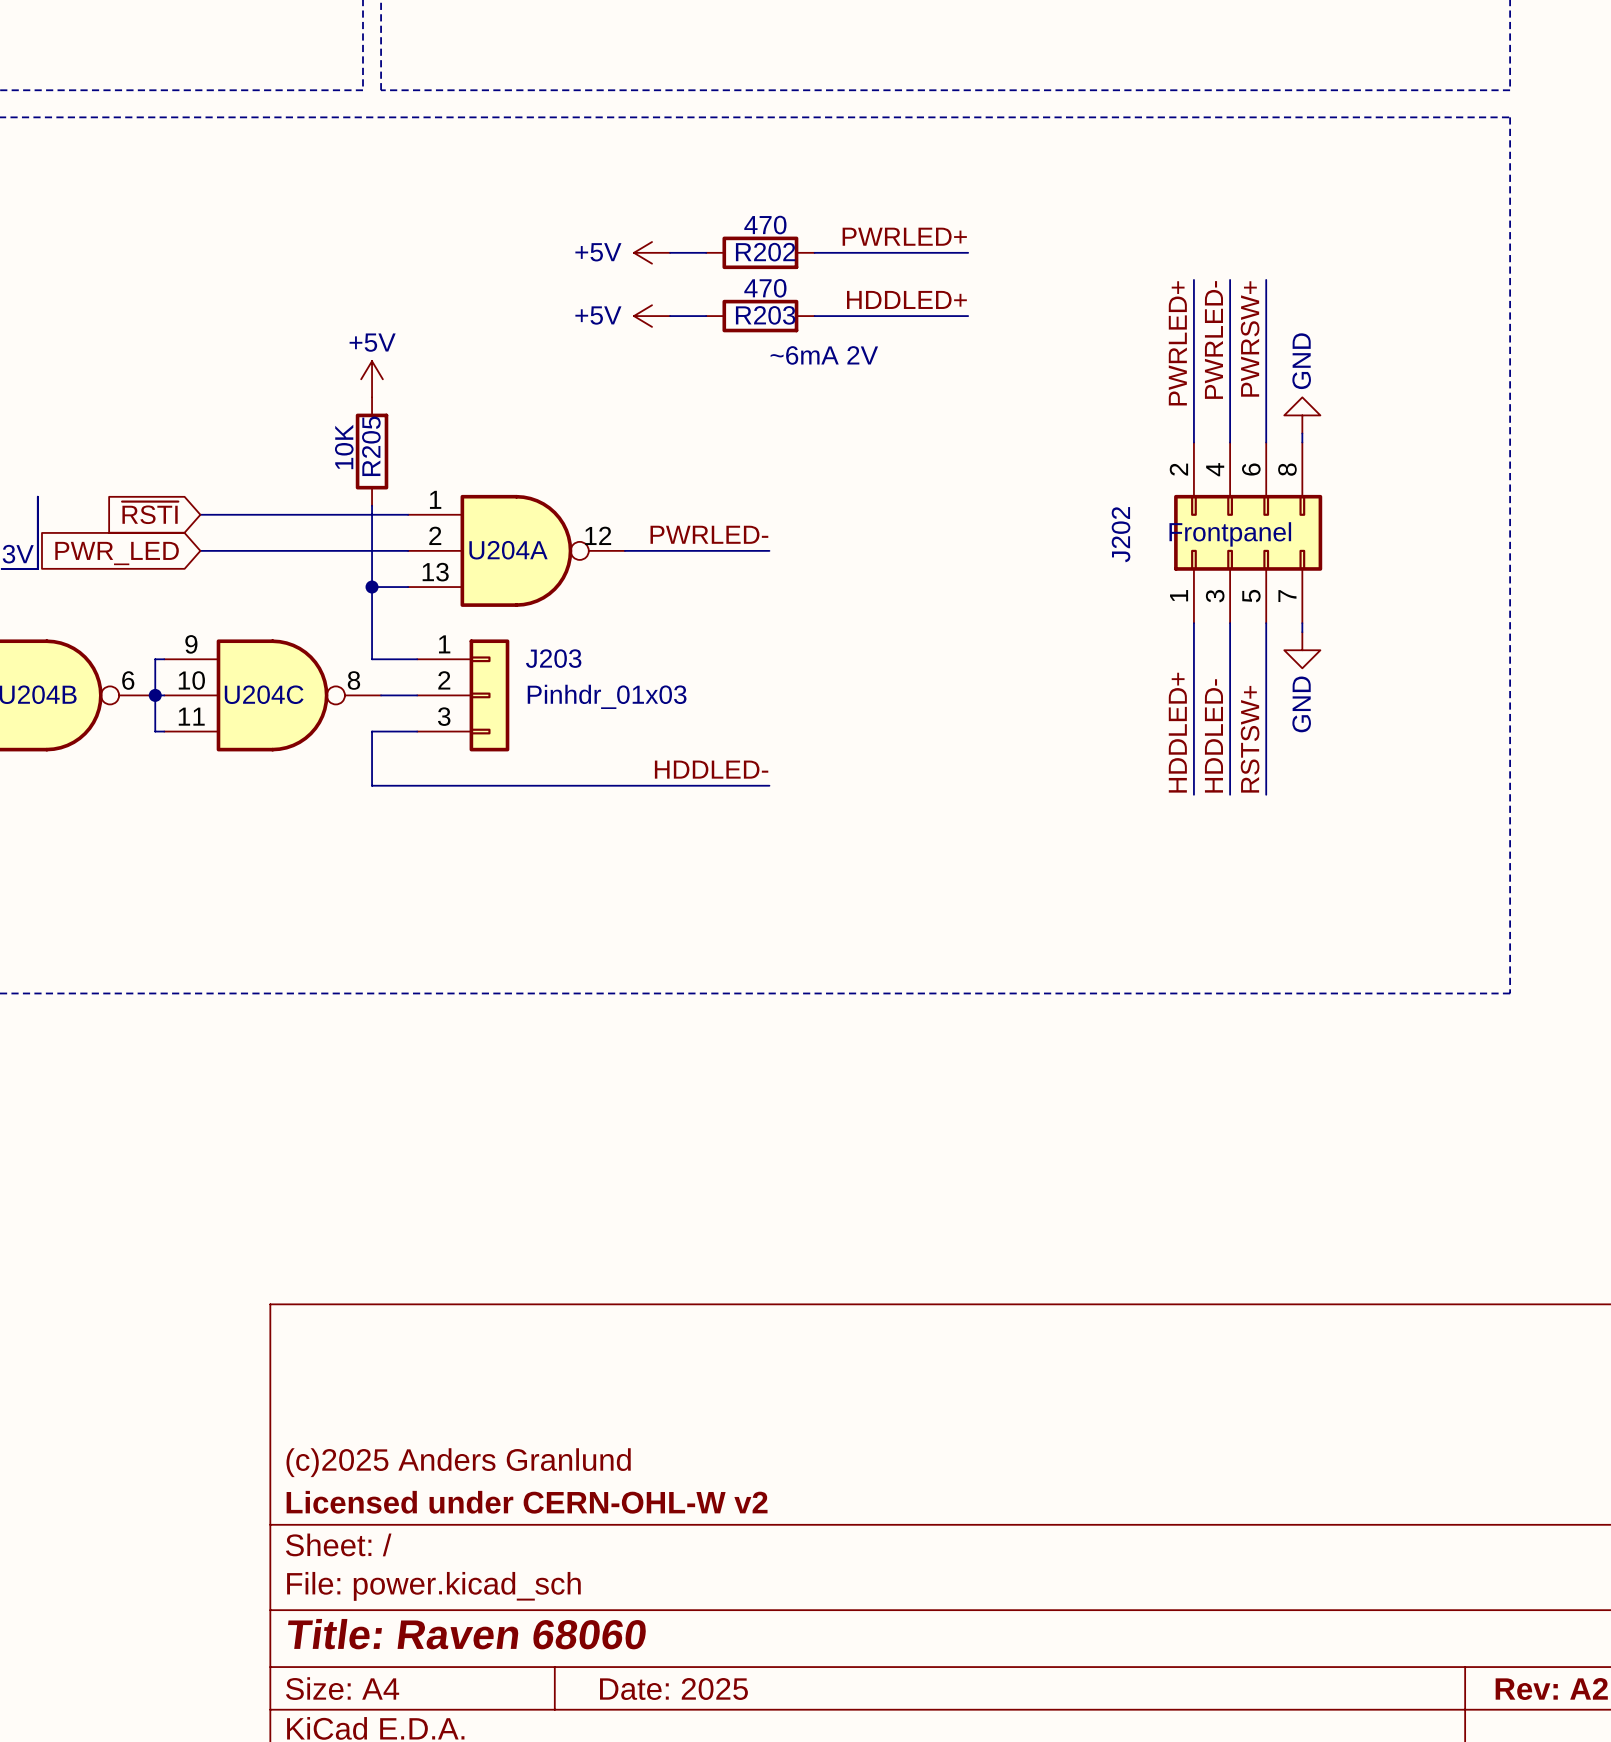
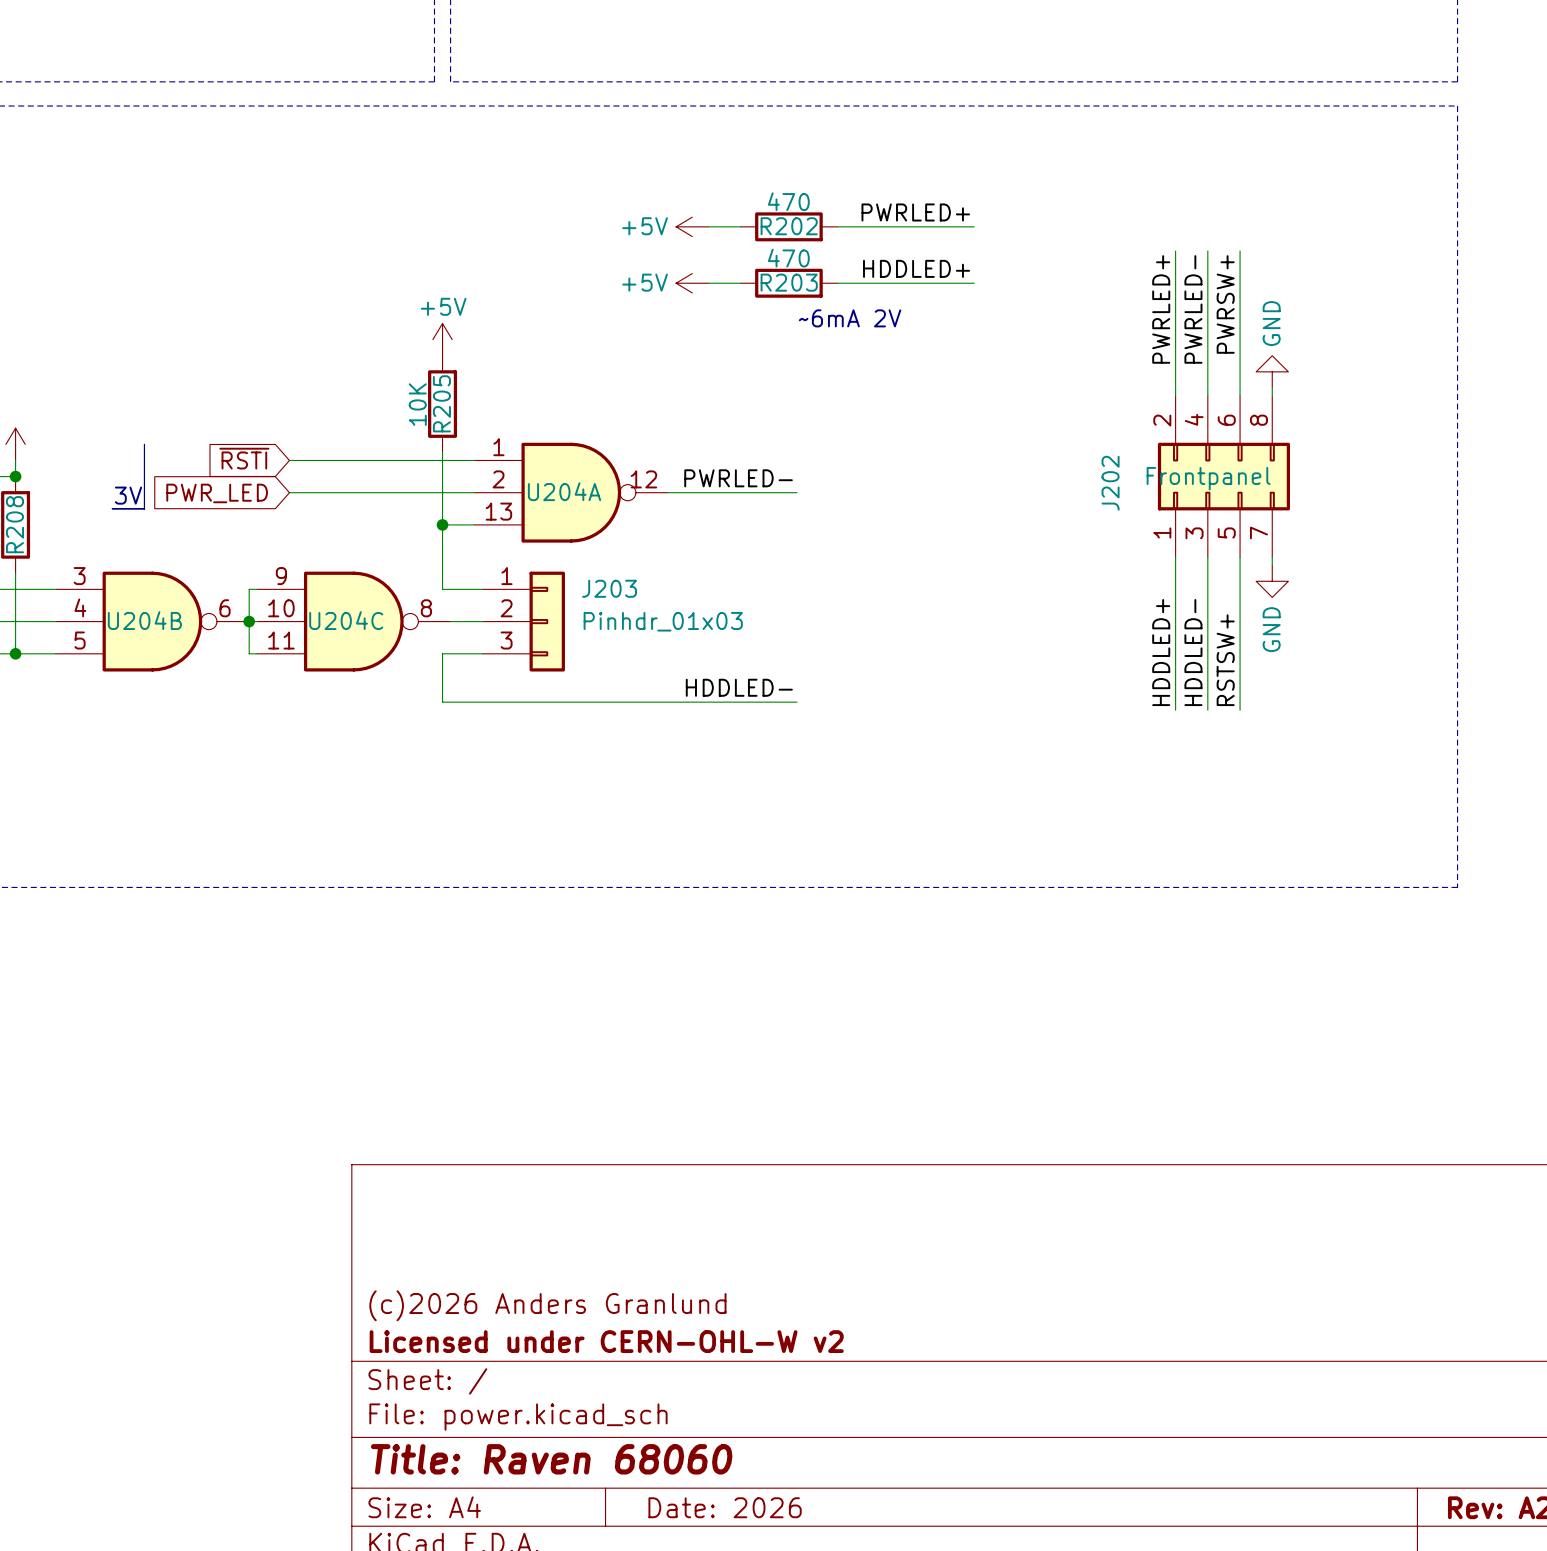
title block: (c)2025 Anders Granlund (458, 1462) -> (c)2026 Anders Granlund (547, 1305)
title block: Date: 2025 (673, 1689) -> Date: 2026 (725, 1507)

